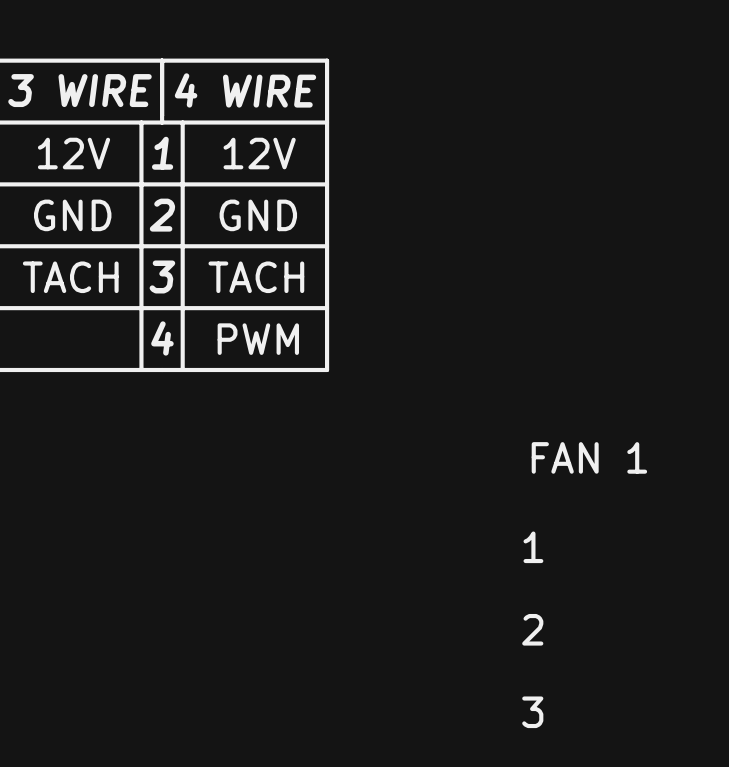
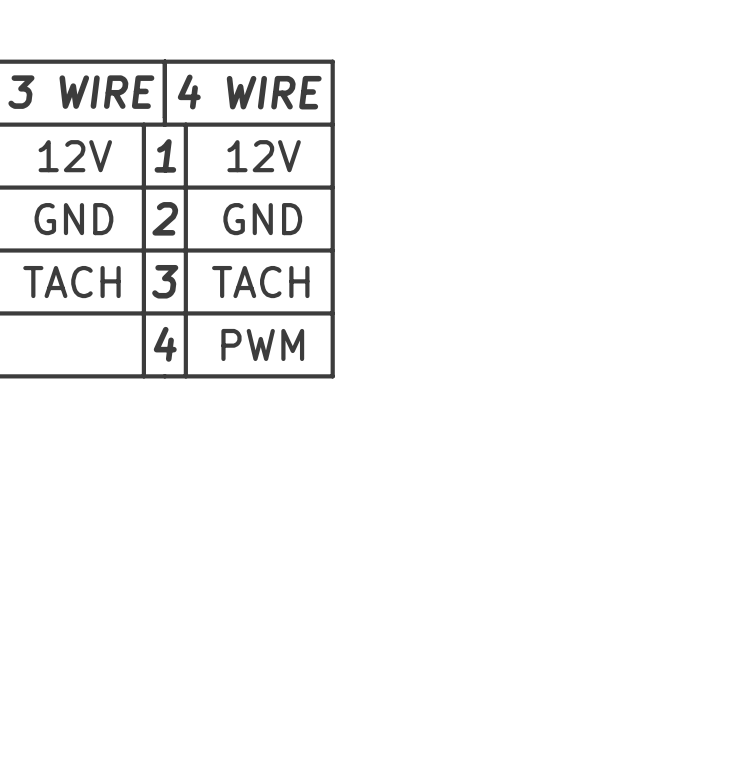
text: FAN 1 (589, 457) -> none
text: 1 (533, 547) -> none
text: 2 (532, 629) -> none
text: 3 (532, 712) -> none

